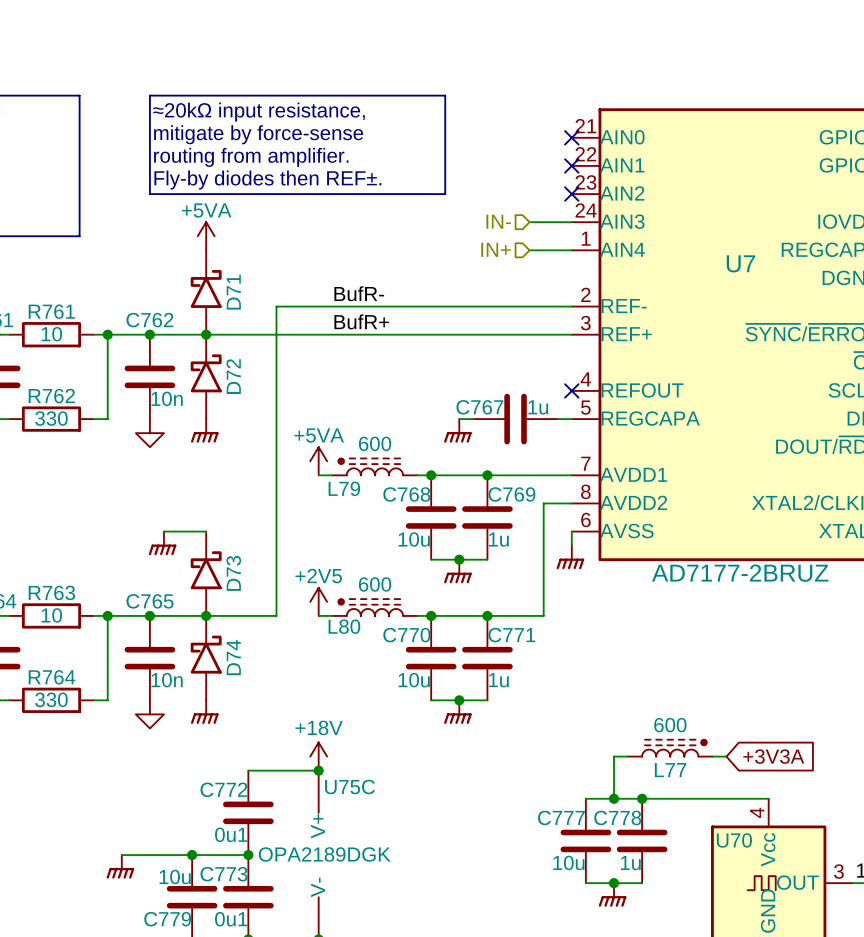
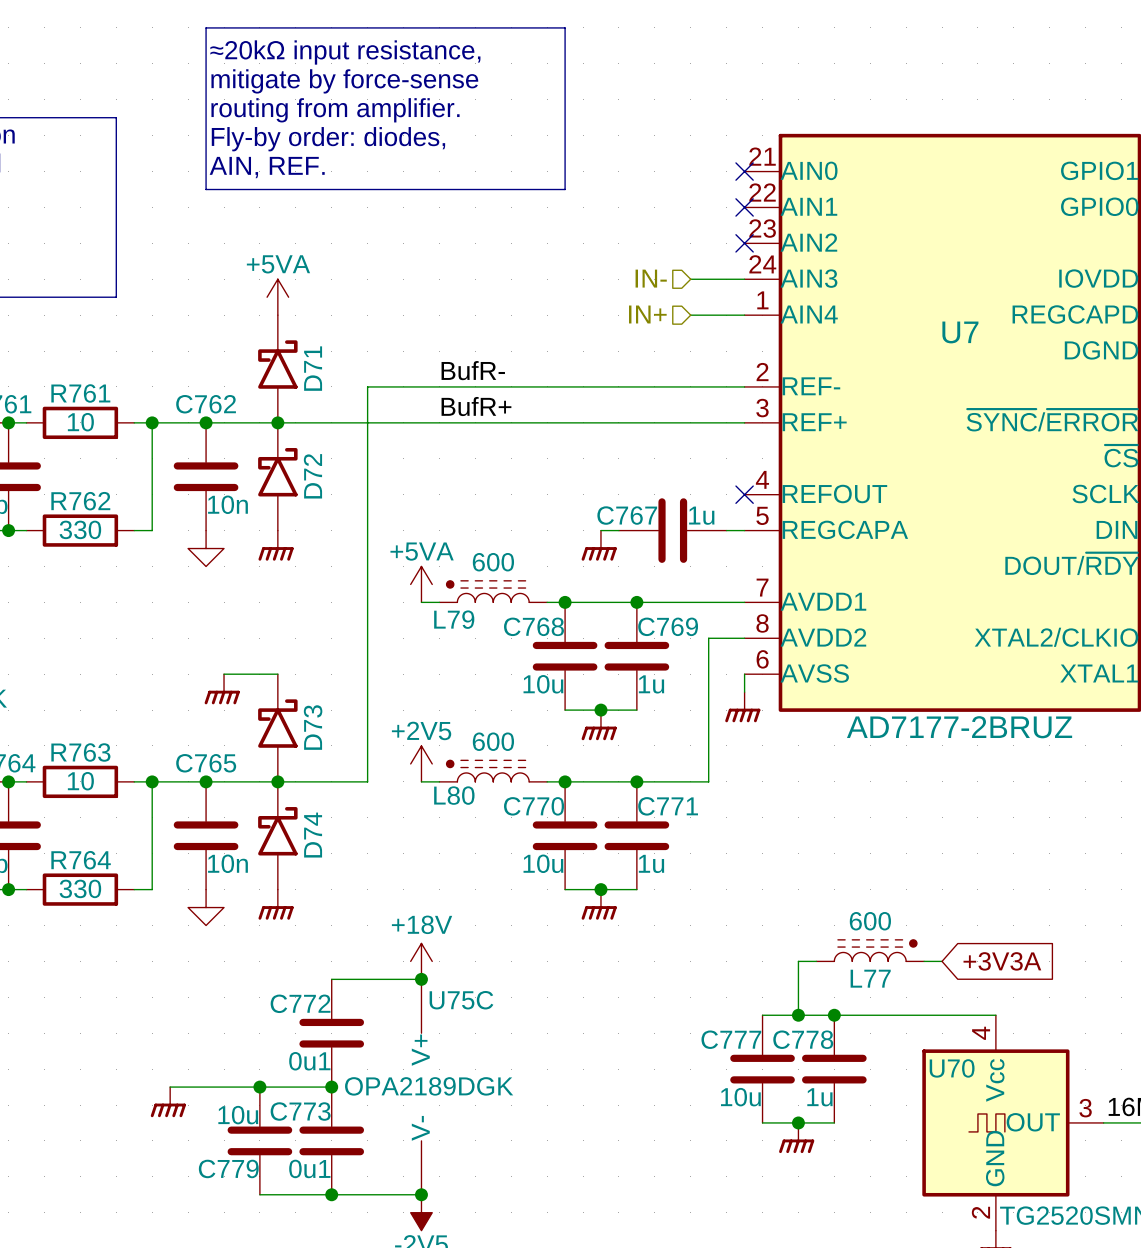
text: none -> ≈20kΩ input resistance, (345, 52)
text: none -> mitigate by force-sense (344, 81)
line: (149, 95) (445, 95) (445, 194) (149, 194) (149, 151) -> (206, 117) (206, 27) (565, 27) (565, 189) (206, 189)
text: ≈20kΩ input resistance, (259, 112) -> Fly-by order: diodes, (328, 139)
text: mitigate by force-sense (258, 134) -> AIN, REF. (267, 167)
text position: routing from amplifier. (251, 157) -> routing from amplifier. (335, 110)
text: Fly-by diodes then REF±. (267, 180) -> none

